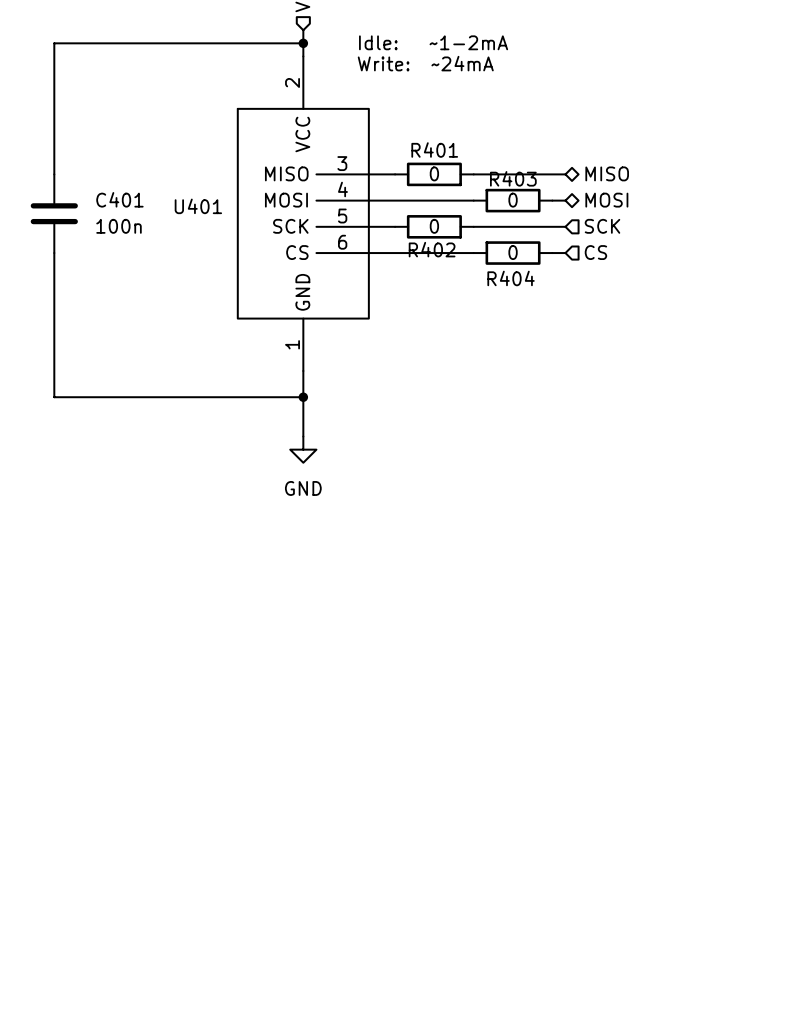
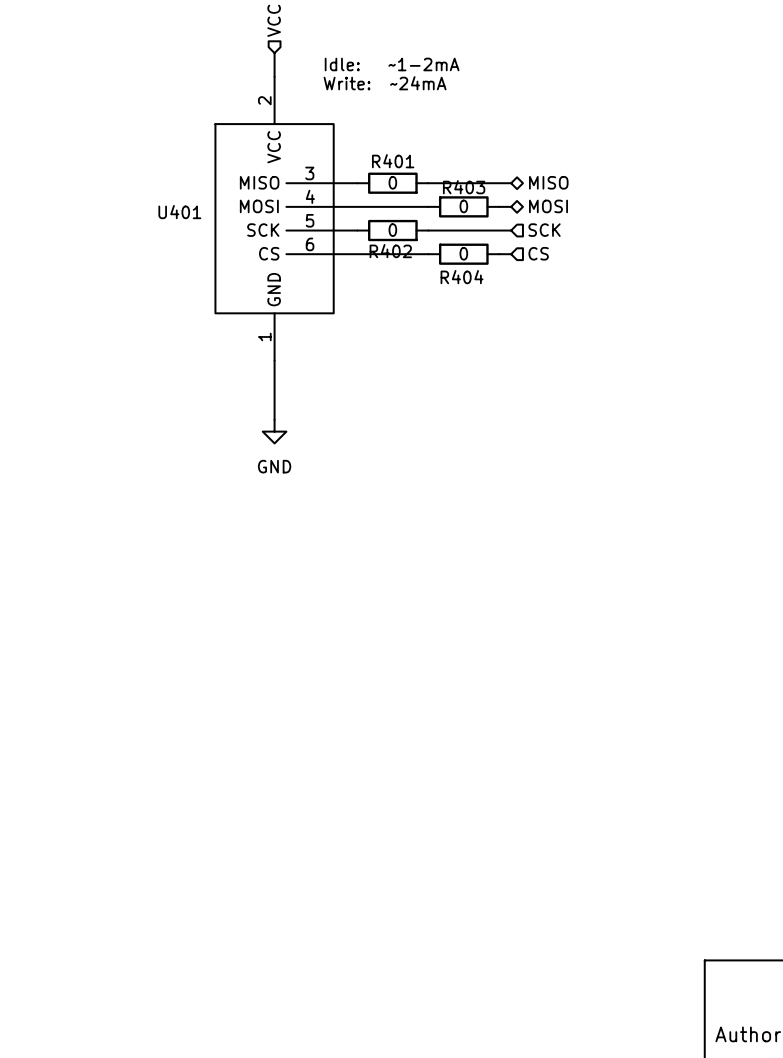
wire: (303, 43) (54, 43) (54, 174) -> none
junction: (303, 43) -> none
C401: 100n (54, 213) -> none
wire: (54, 253) (54, 397) (303, 397) -> none
junction: (303, 397) -> none

